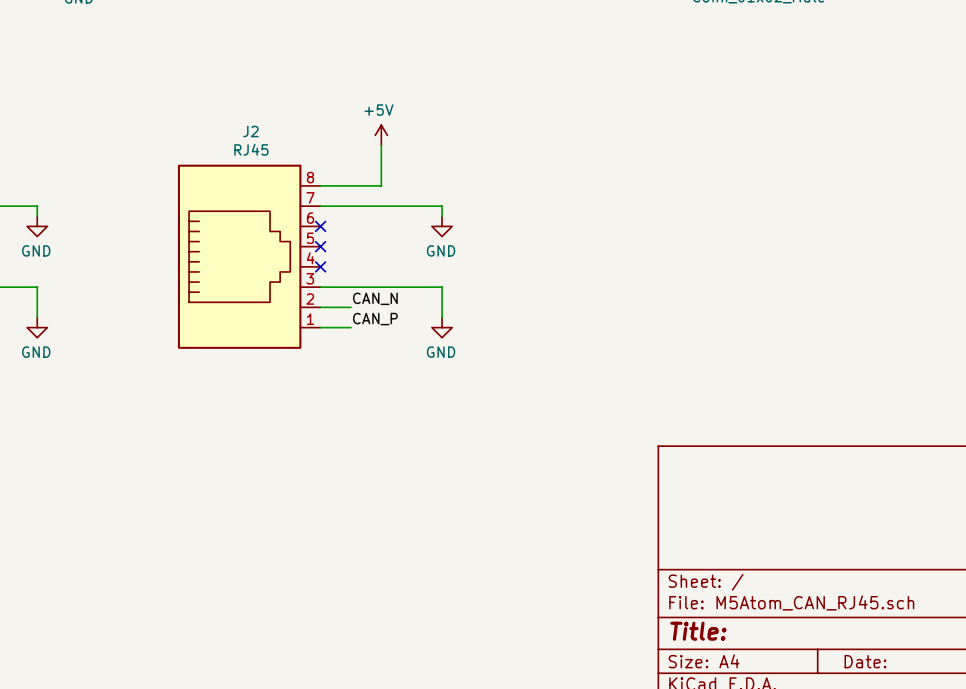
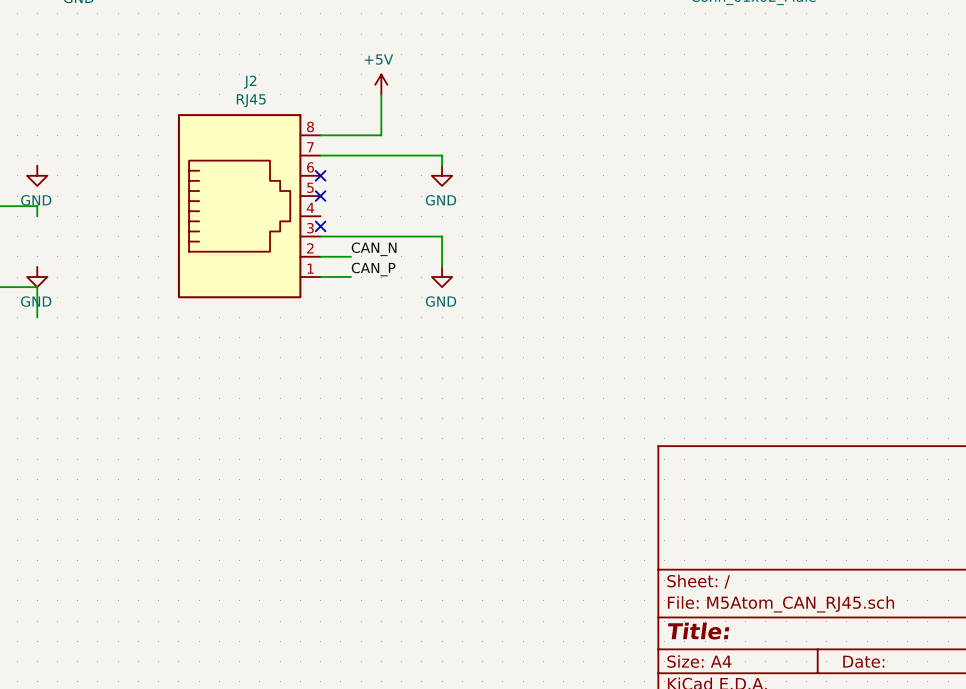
power symbol position: +5V (381, 135) -> +5V (381, 84)
wire: (381, 145) (381, 185) (320, 185) -> (381, 94) (381, 135) (320, 135)
power symbol: none -> GND (37, 175)
no-connect mark: none -> (320, 175)
power symbol: none -> GND (442, 175)
no-connect mark: none -> (320, 196)
wire: (320, 206) (442, 206) (442, 216) -> (320, 155) (442, 155) (442, 165)
power symbol: GND (37, 226) -> none
power symbol: GND (442, 226) -> none
no-connect mark: (320, 246) -> none
J2 position: (249, 256) -> (249, 206)
no-connect mark: (320, 266) -> none
power symbol: none -> GND (37, 277)
power symbol: none -> GND (442, 277)
wire: (320, 287) (442, 287) (442, 317) -> (320, 236) (442, 236) (442, 266)
label position: CAN_N (375, 298) -> CAN_N (374, 249)
wire: (320, 307) (350, 307) -> (320, 256) (350, 256)
label position: CAN_P (375, 319) -> CAN_P (373, 269)
power symbol: GND (37, 327) -> none
wire: (320, 327) (350, 327) -> (320, 277) (350, 277)
power symbol: GND (442, 327) -> none

